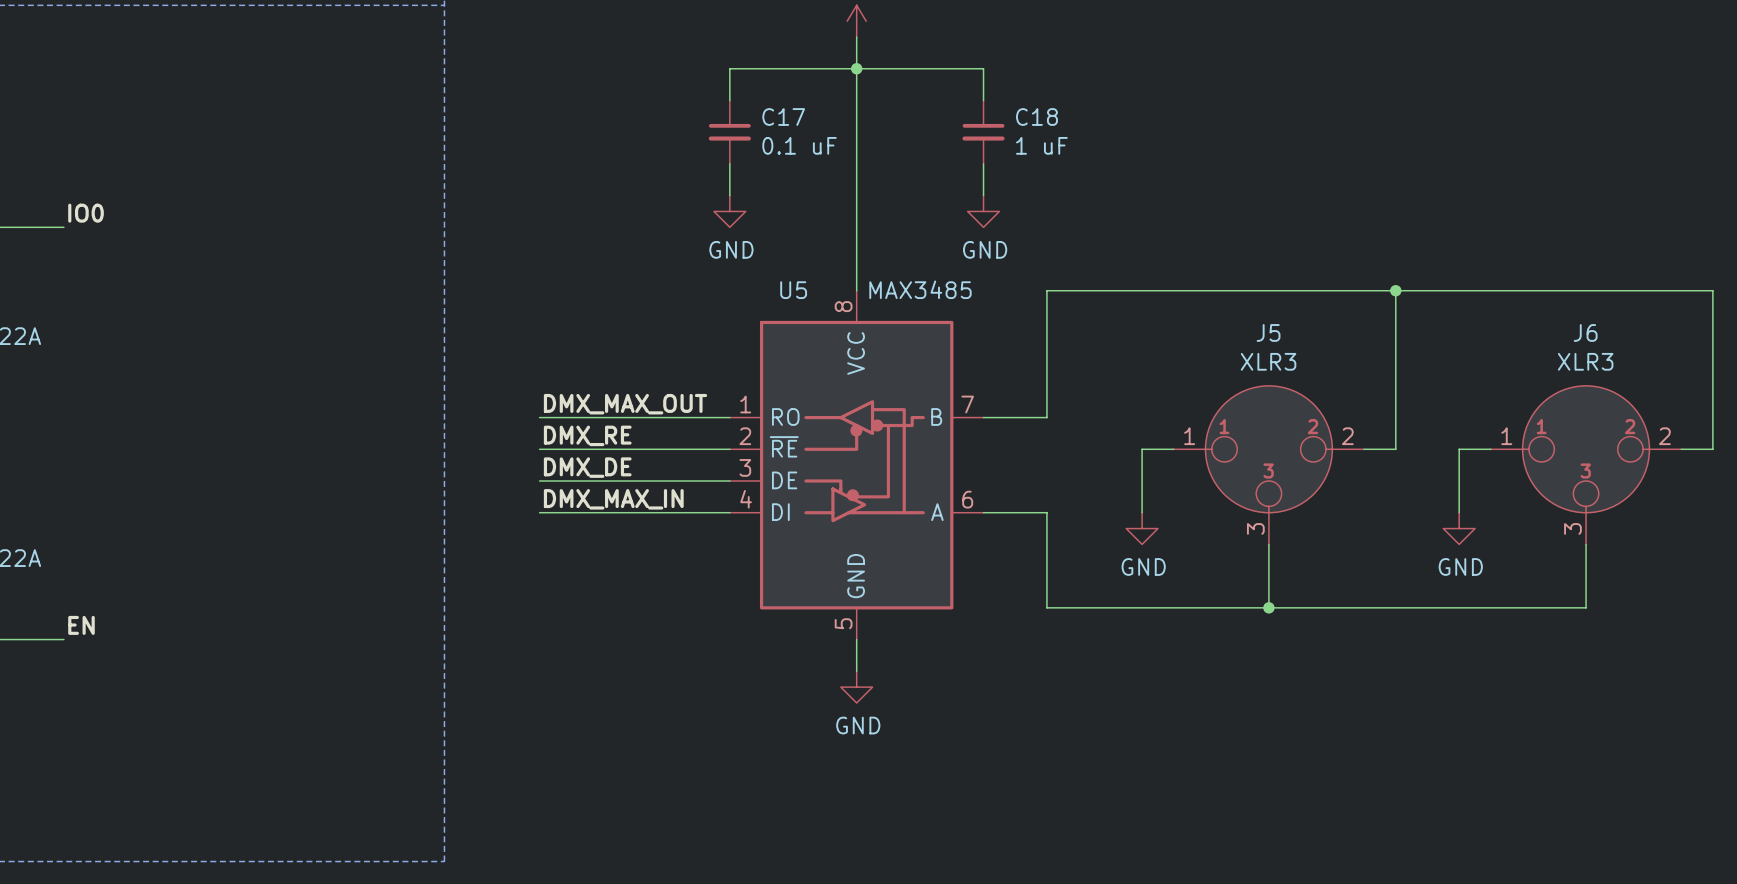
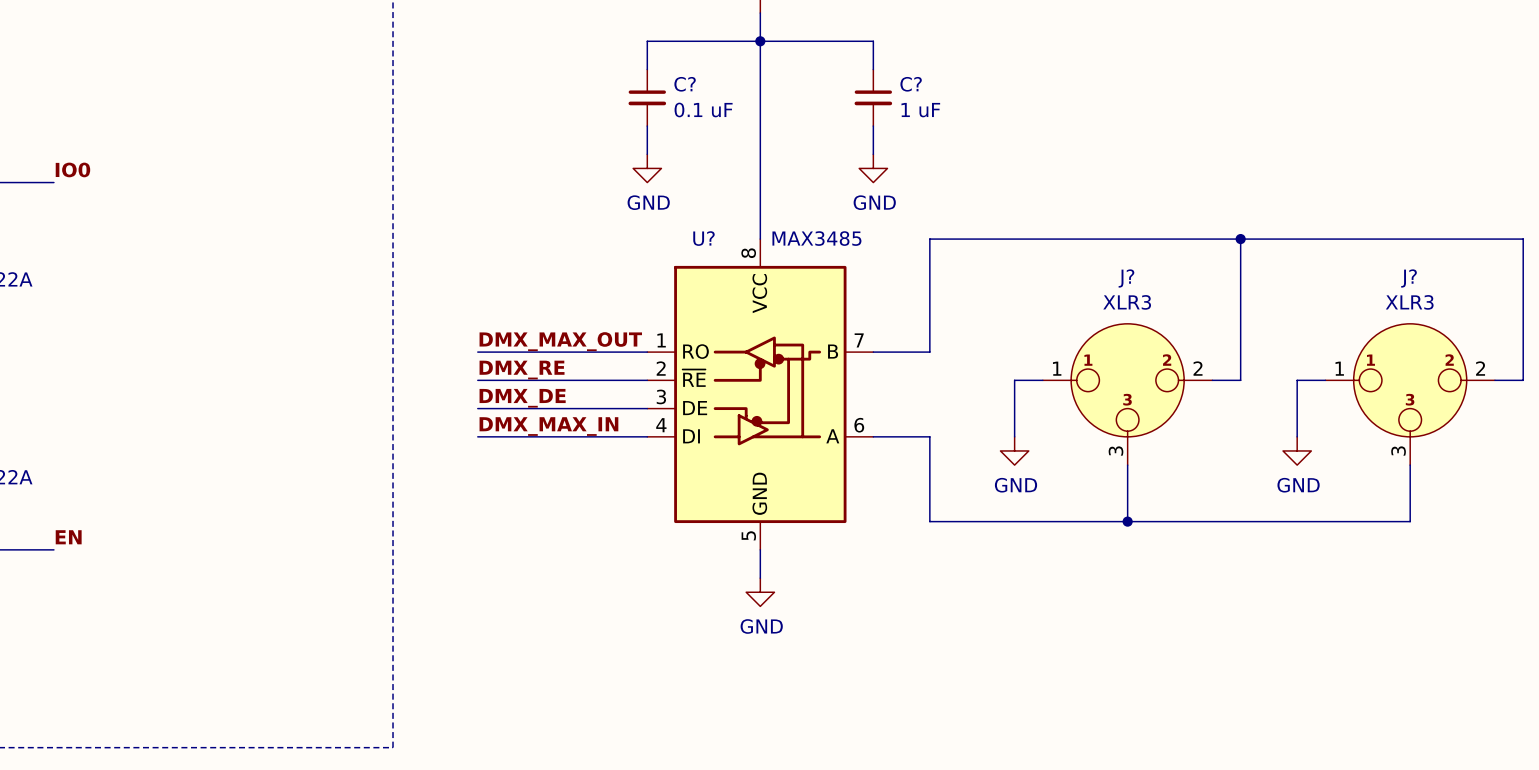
C17 name: C17 (783, 117) -> C? (685, 84)
C18 name: C18 (1036, 117) -> C? (911, 84)
U5 name: U5 (793, 290) -> U? (703, 238)
J5 name: J5 (1268, 332) -> J? (1126, 278)
J6 name: J6 (1585, 332) -> J? (1409, 278)

